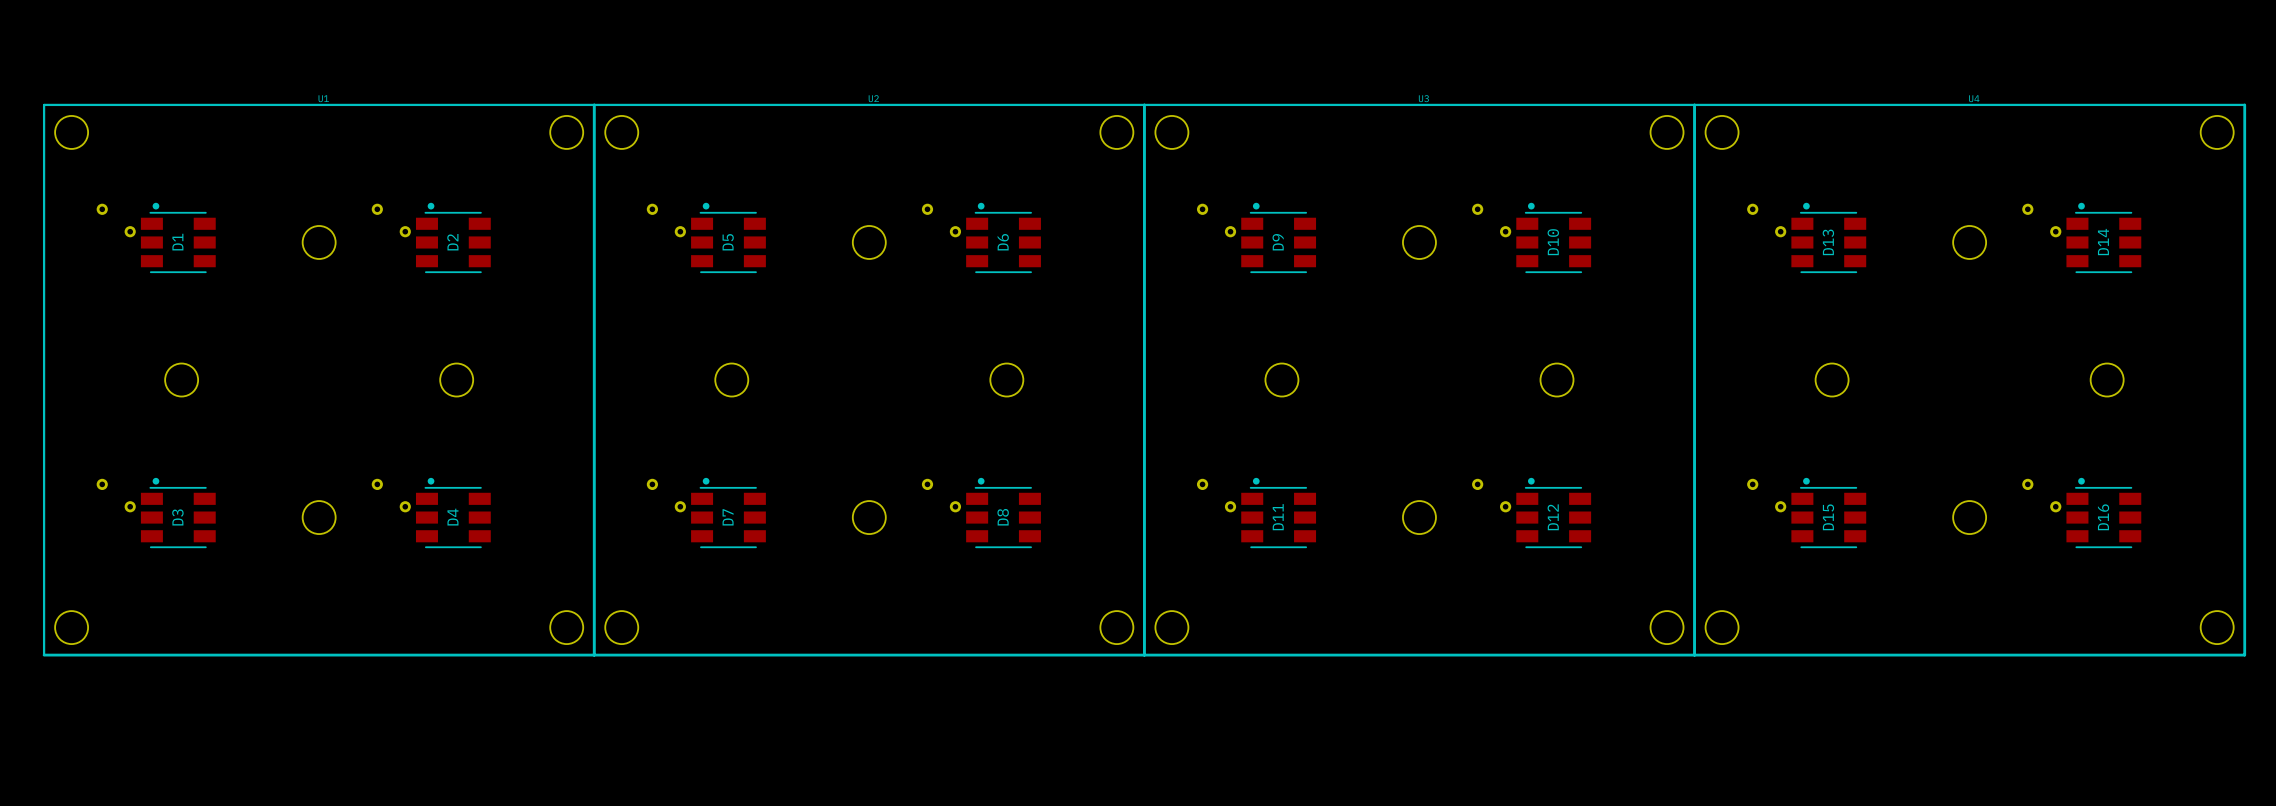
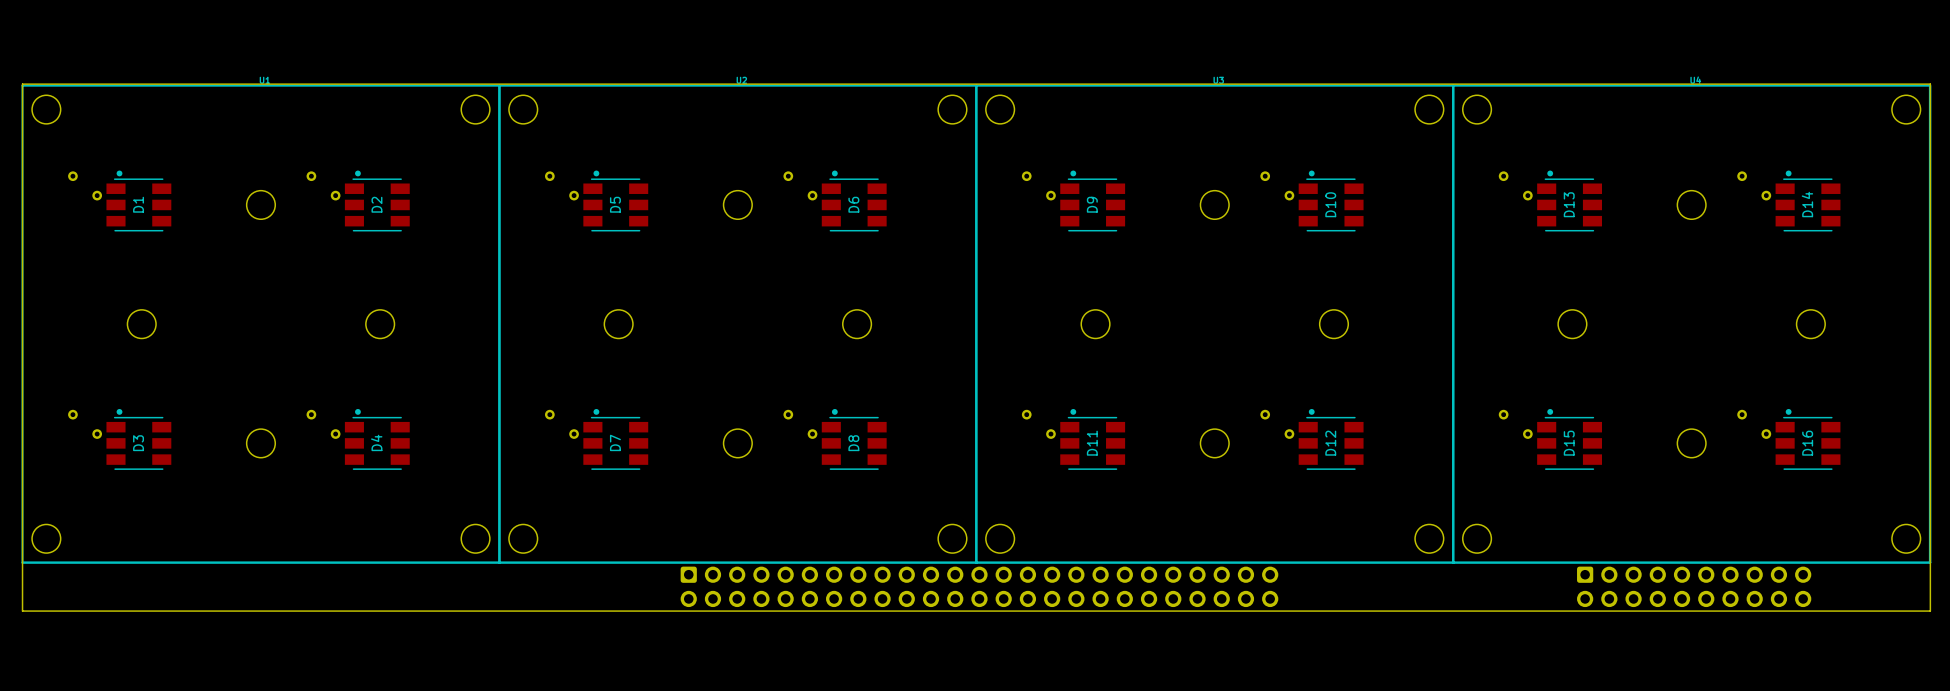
board edge: none -> (22, 84) (1930, 84) (1930, 611) (22, 611) (22, 84)
part: none -> (979, 586)
part: none -> (1694, 586)

